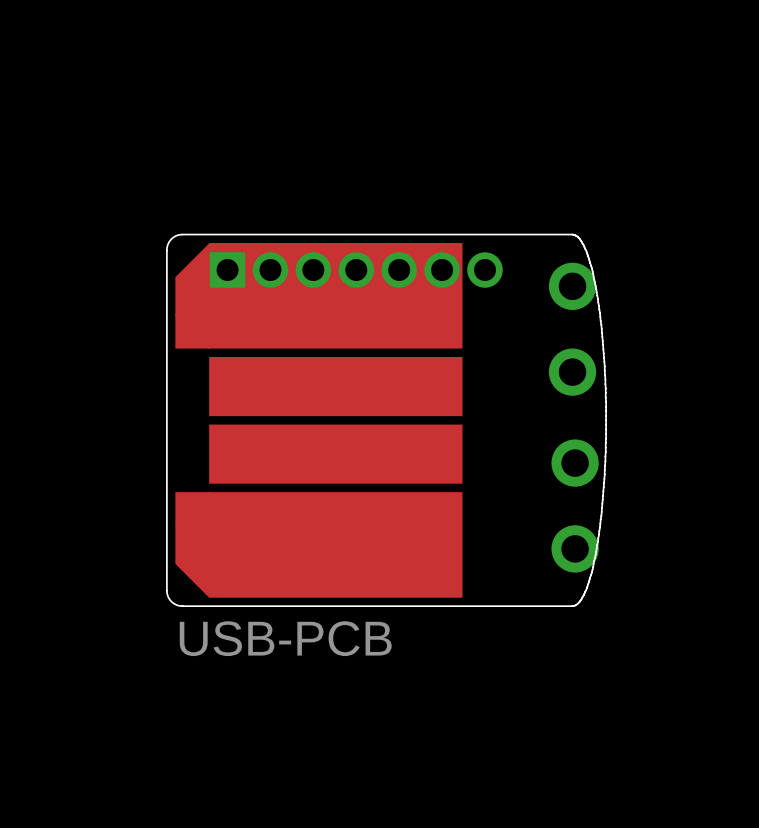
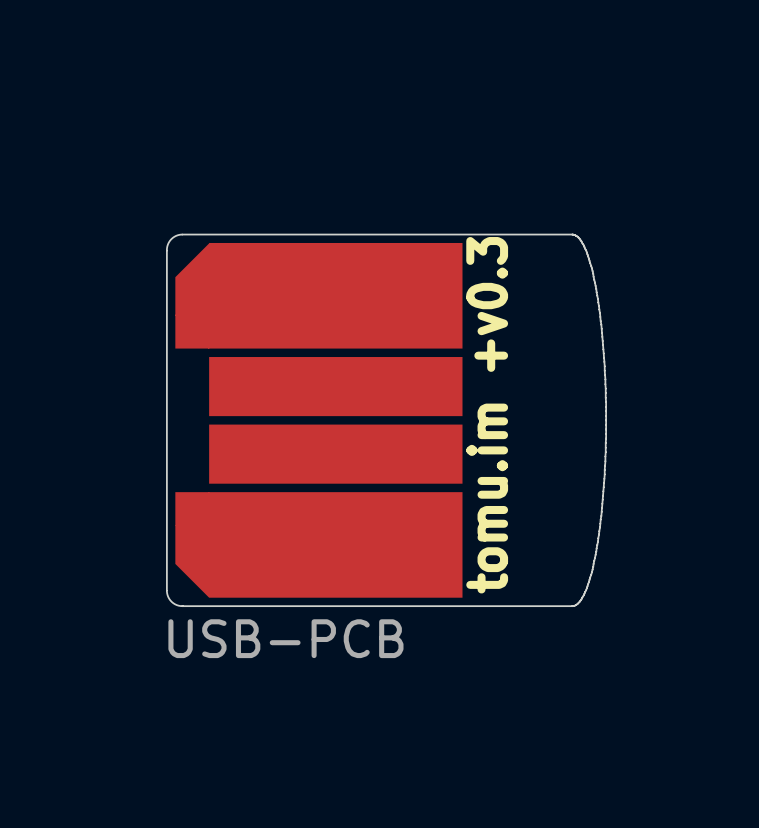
part: (356, 270) -> none
part: (572, 329) -> none
text: none -> tomu.im +v0.3 (487, 415)
part: (575, 505) -> none

